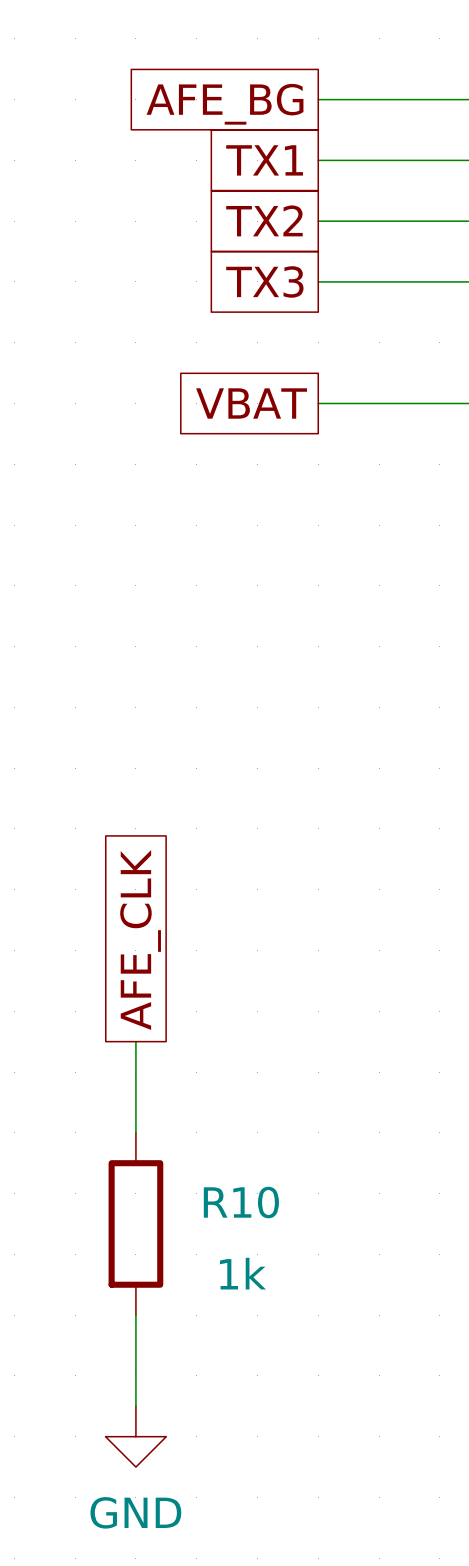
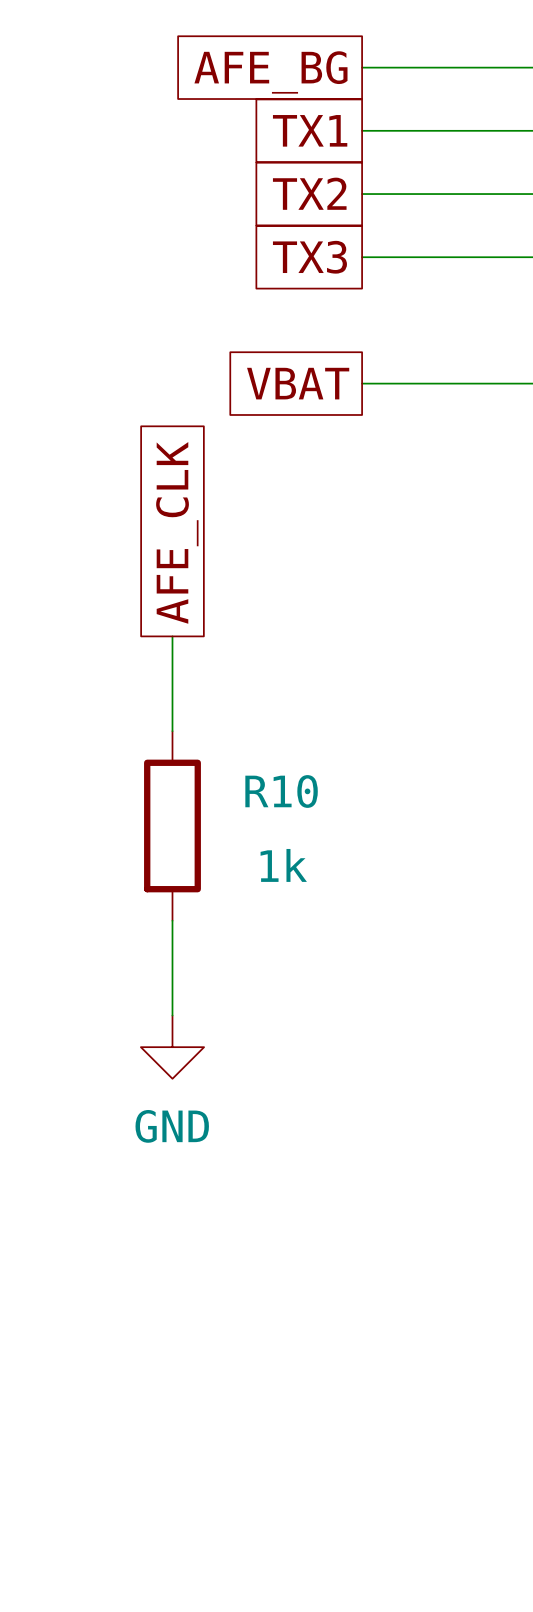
wire: none -> (172, 636) (172, 731)
global label position: AFE_CLK (140, 939) -> AFE_CLK (177, 532)
wire: (135, 1041) (135, 1132) -> (172, 920) (172, 1015)
R10 name position: R10 (241, 1202) -> R10 (281, 791)
R10 position: (135, 1223) -> (172, 825)
R10 value position: 1k (242, 1273) -> 1k (283, 865)
wire: (135, 1315) (135, 1406) -> none
power symbol position: GND (135, 1436) -> GND (172, 1047)

